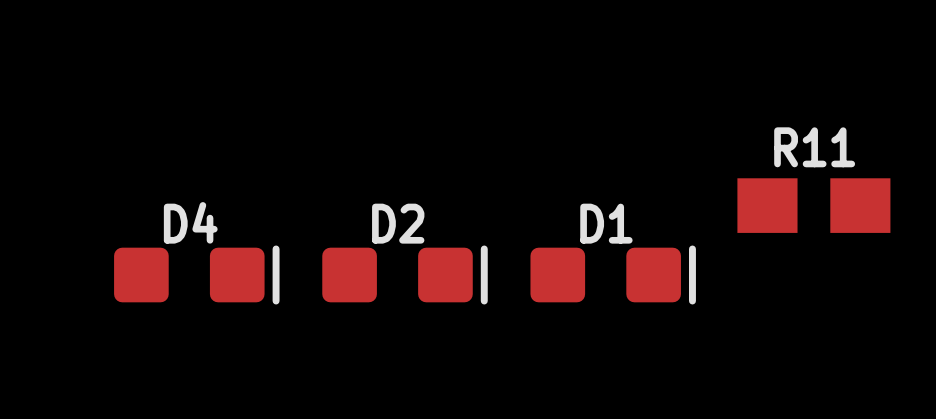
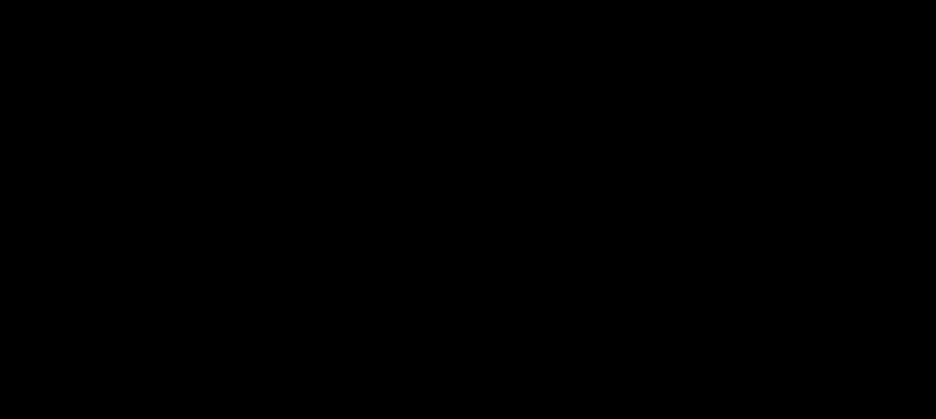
R11: (813, 205) -> none
D4: (196, 275) -> none
D2: (405, 275) -> none
D1: (613, 275) -> none

